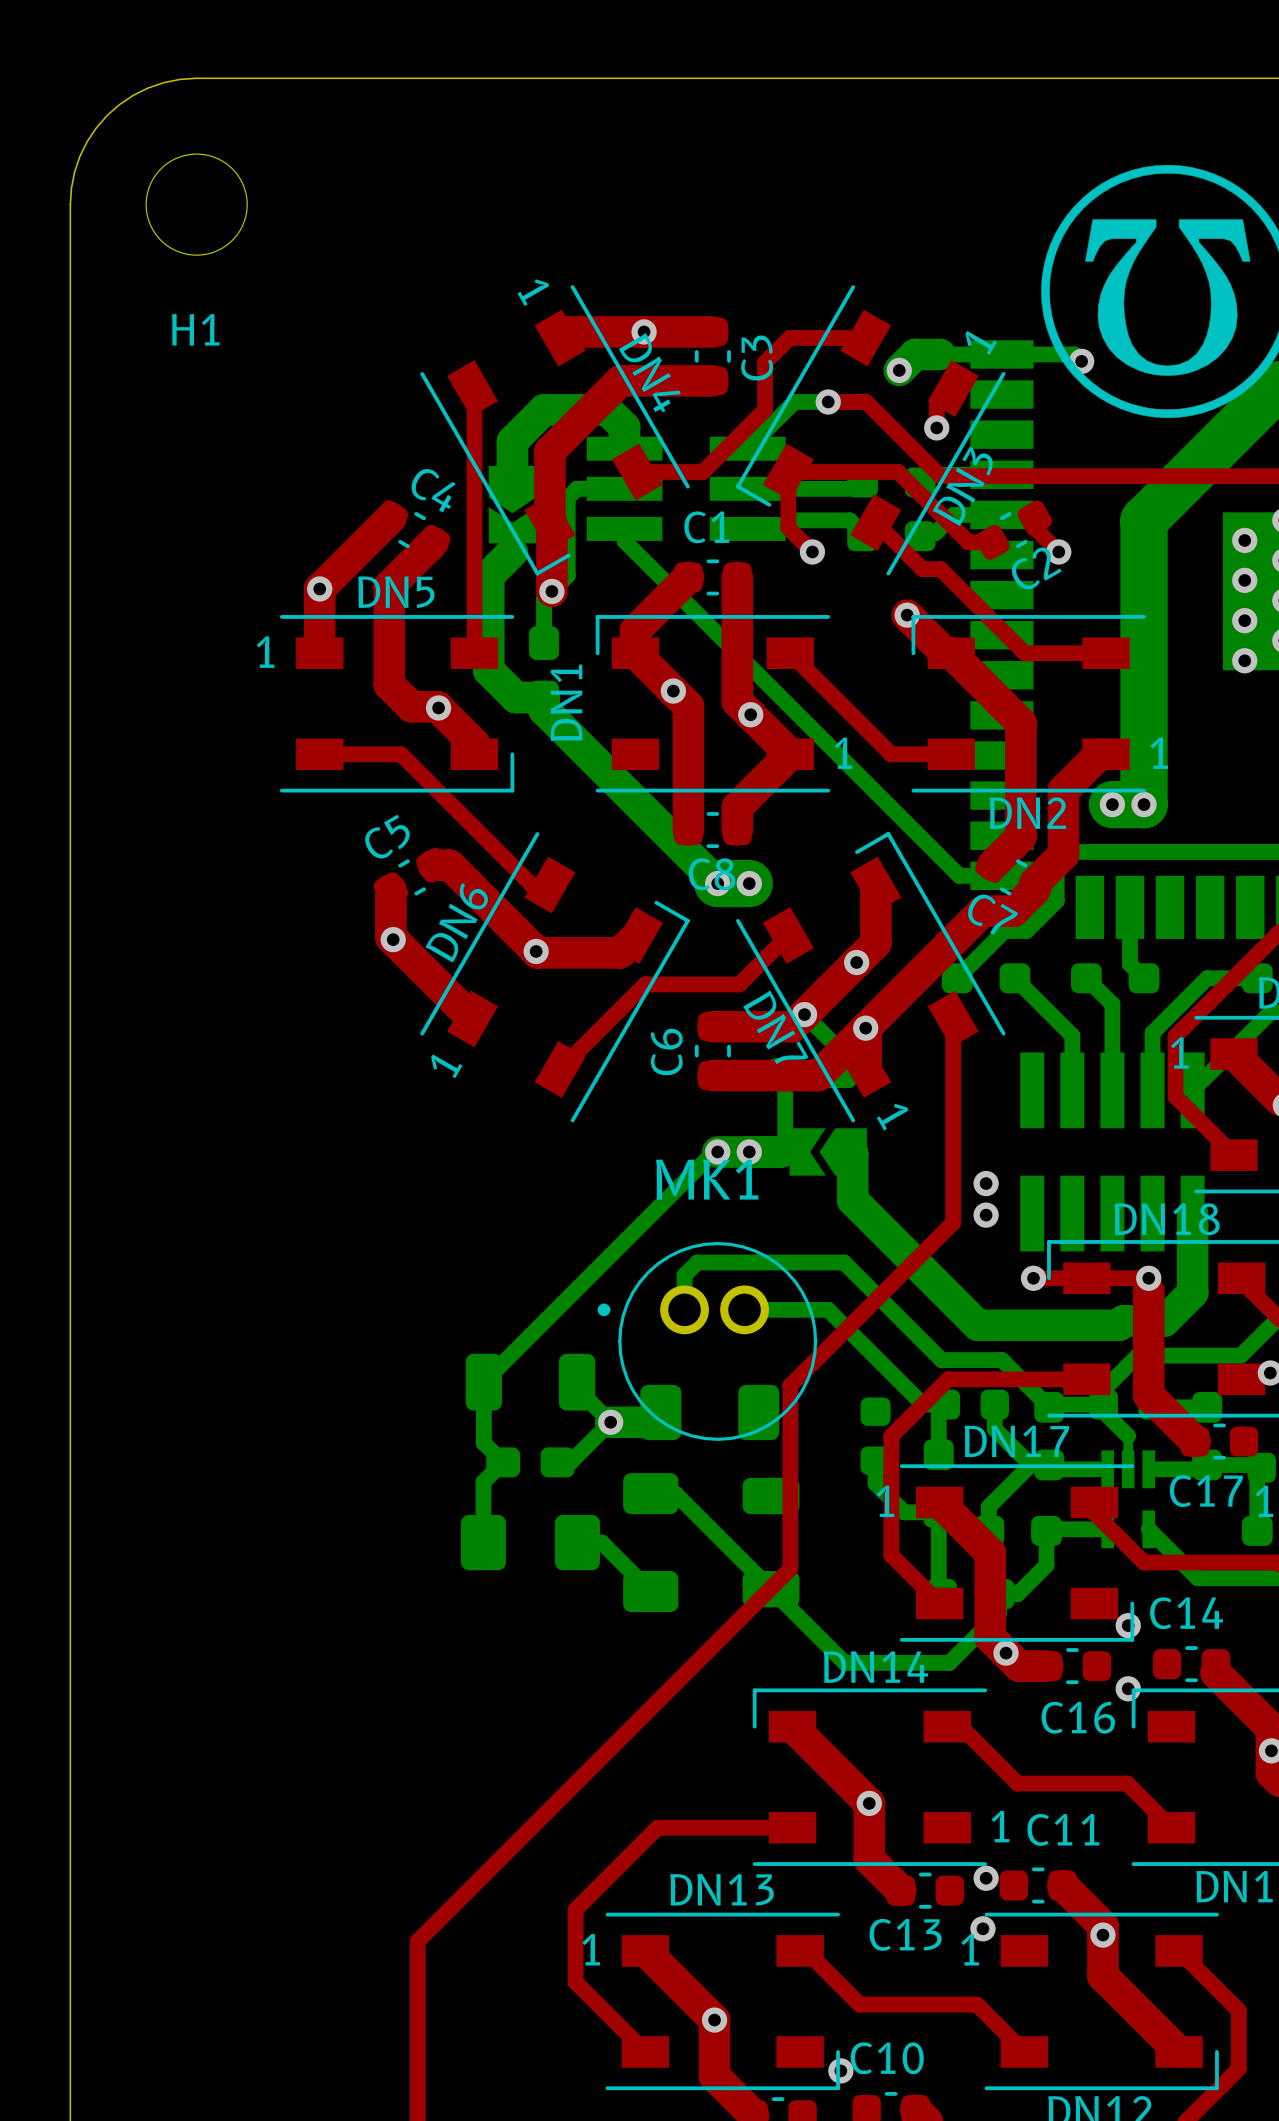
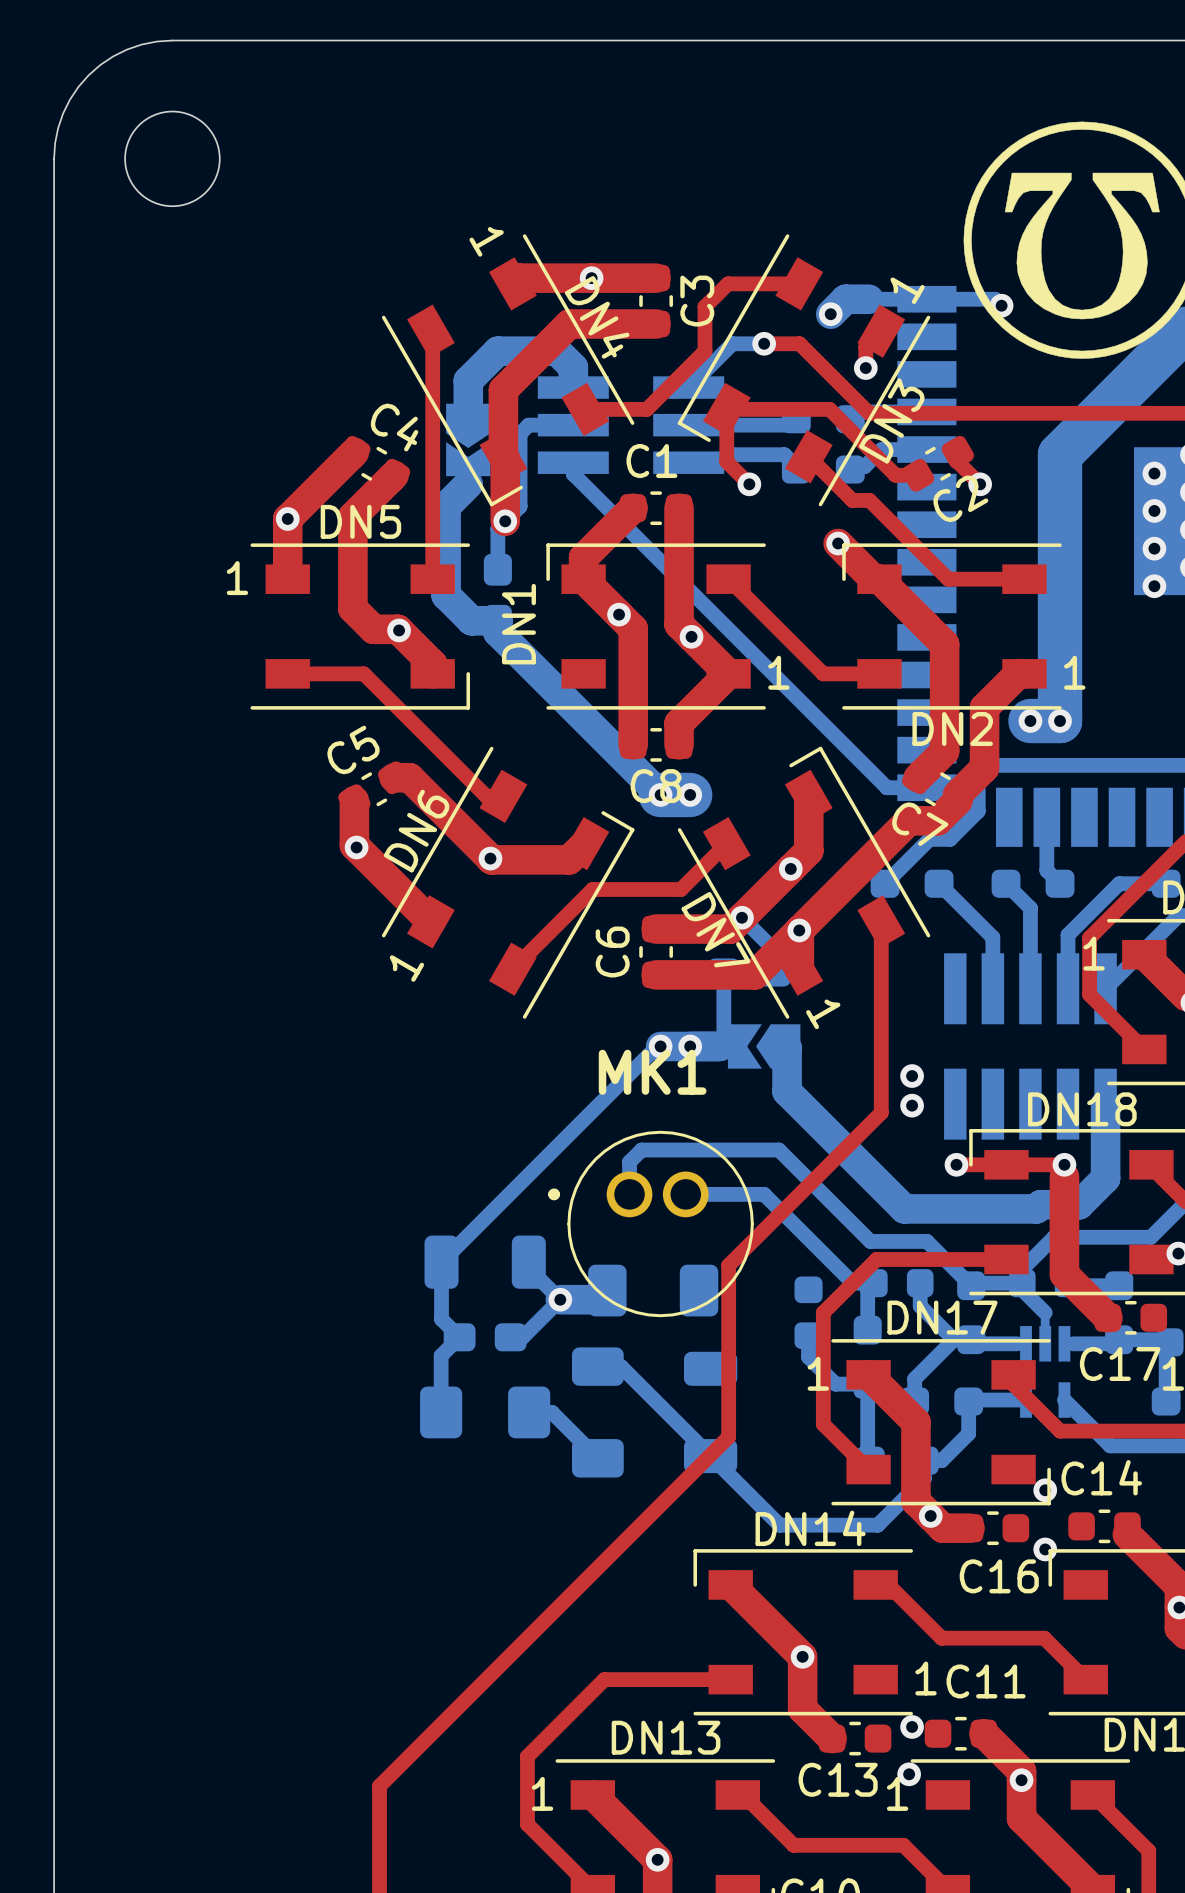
H1 name: H1 (195, 329) -> none

